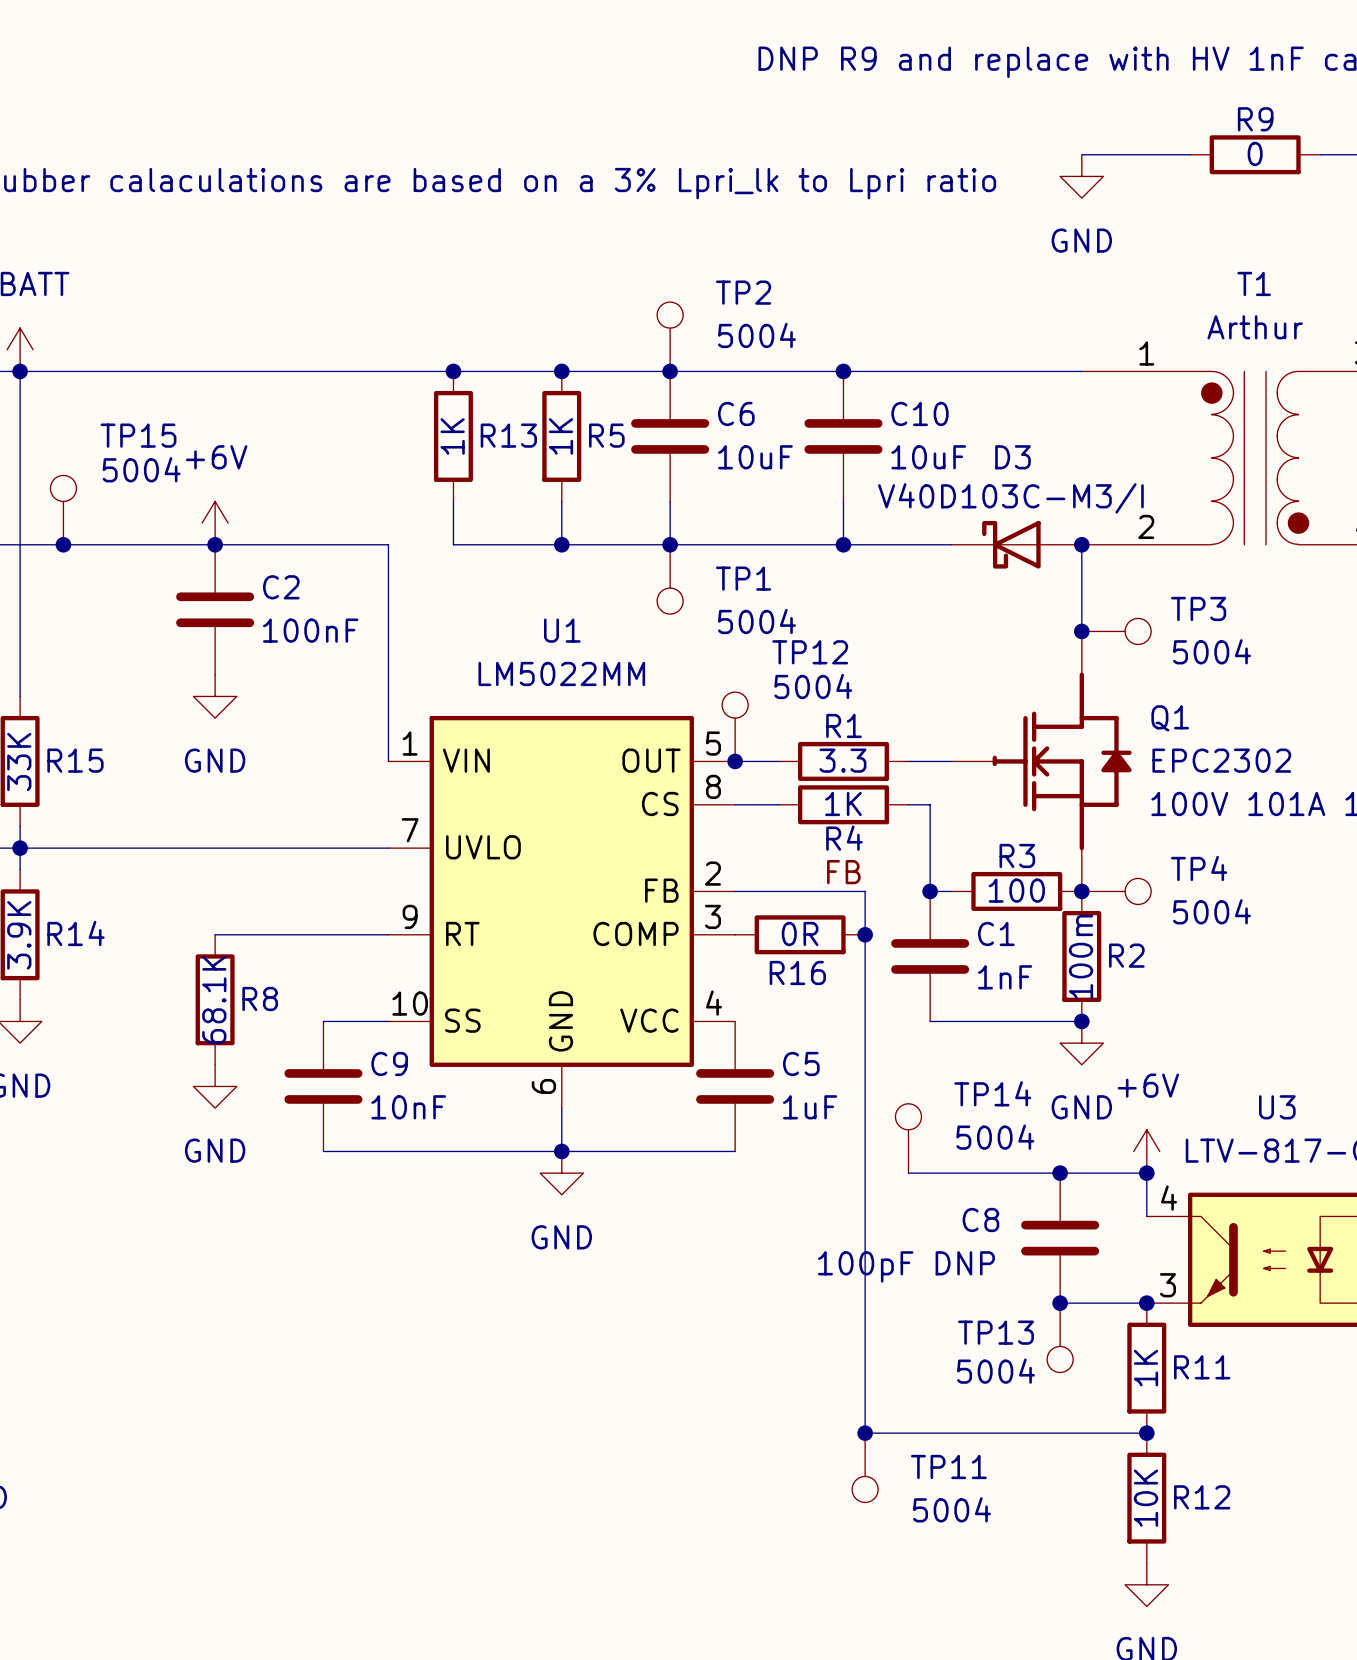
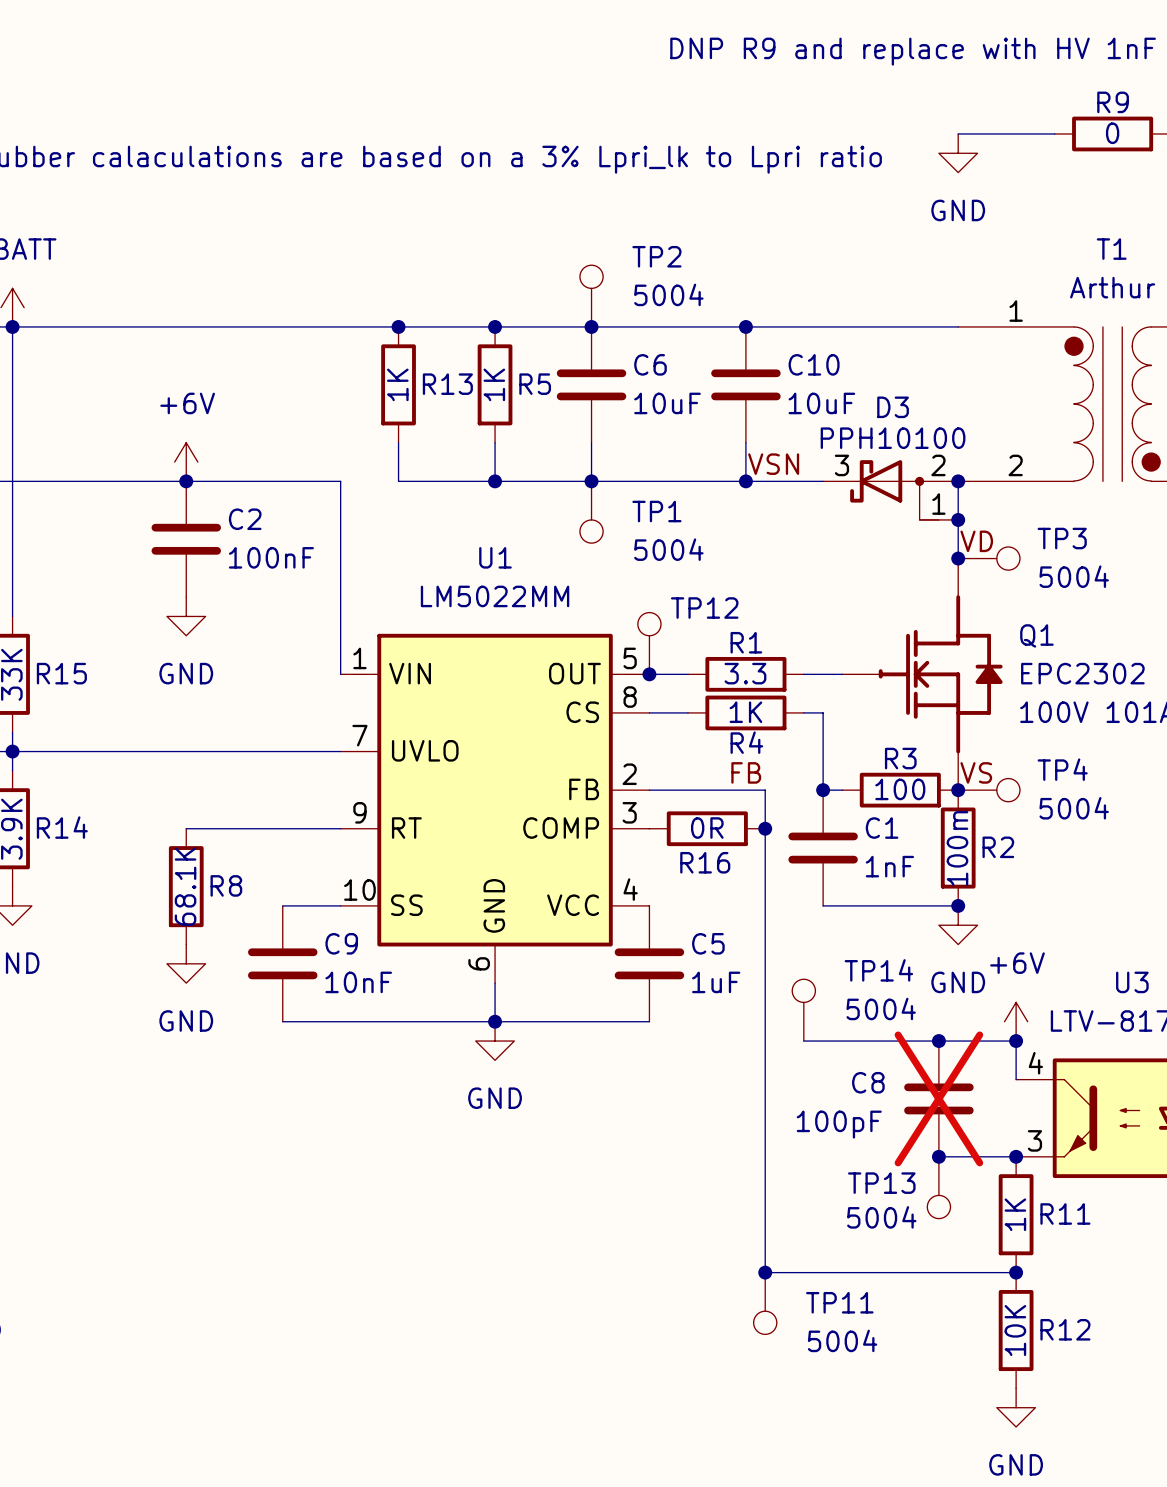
D3 value: V40D103C-M3/I (1010, 498) -> PPH10100 (893, 438)
TP15: 5004 (63, 510) -> none
D3 symbol: [951, 520, 1082, 569] -> [823, 460, 959, 520]
label: none -> VSN (773, 464)
junction: (63, 544) -> none
junction: none -> (958, 519)
label: none -> VD (976, 541)
TP12 name position: TP12 (810, 652) -> TP12 (704, 608)
TP12 value: 5004 (813, 686) -> none
label: none -> VS (976, 772)
C8 do-not-place cross: none -> (938, 1098)
C8 value: 100pF DNP (906, 1266) -> 100pF (839, 1124)

